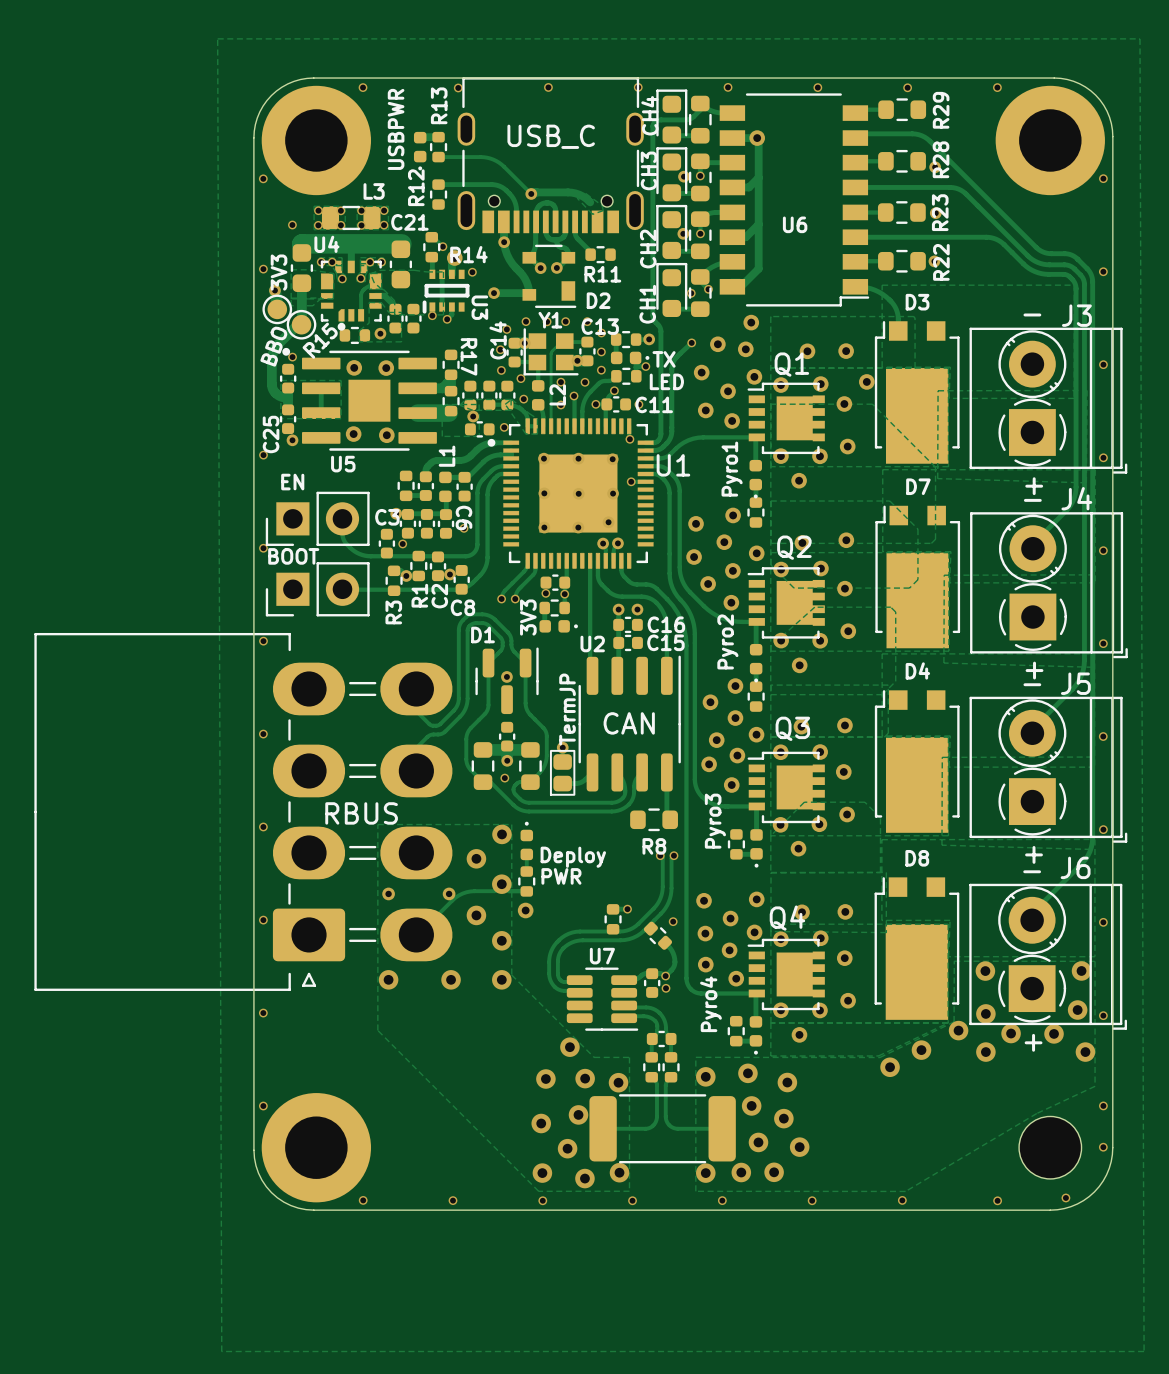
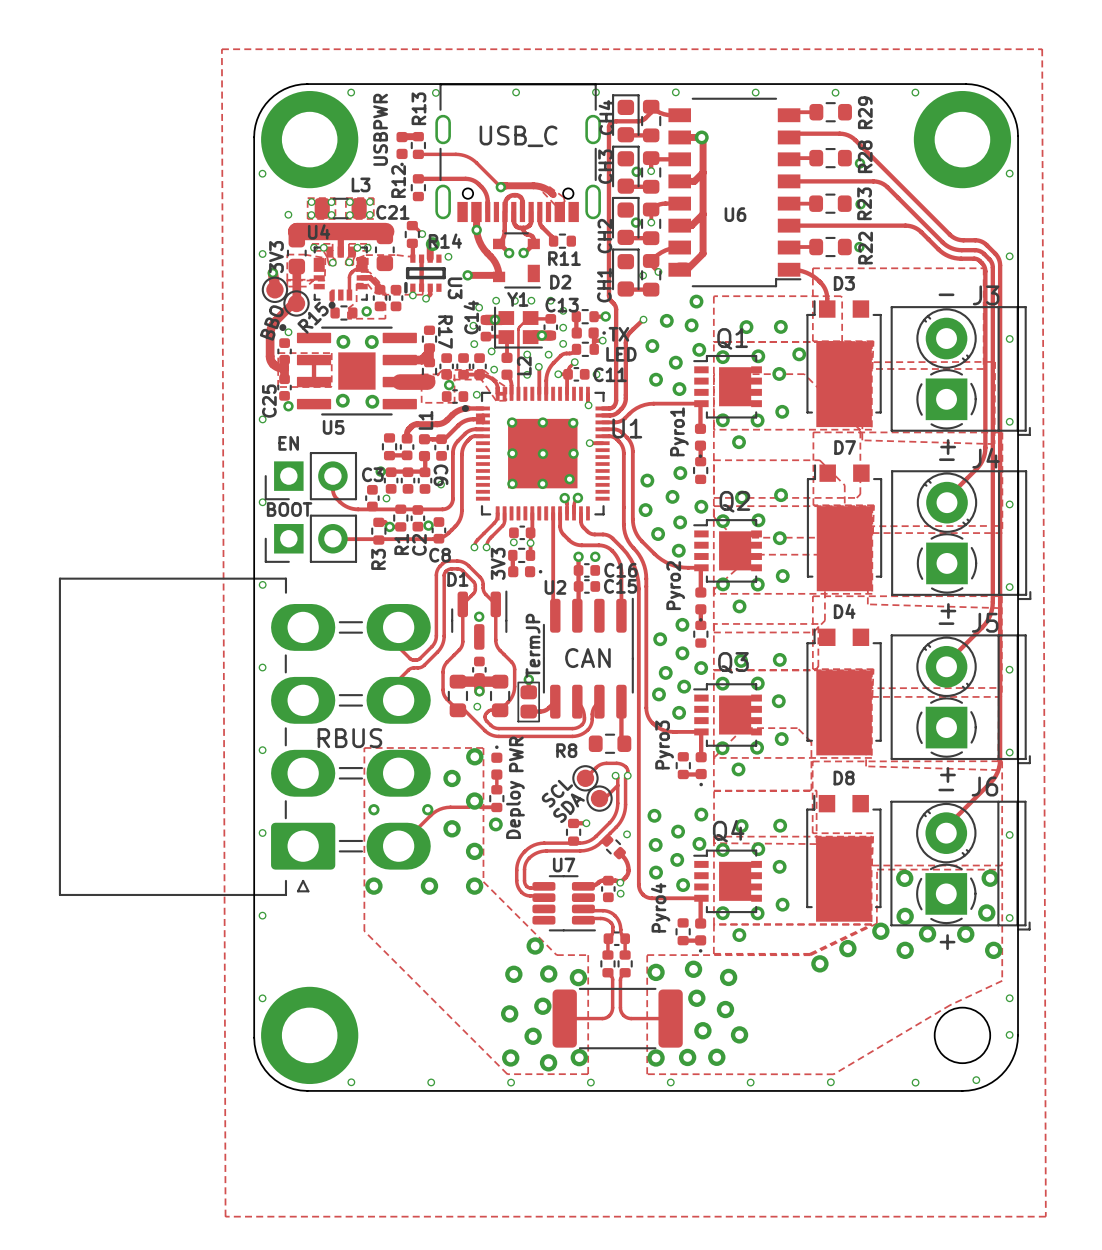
R8 name position: R8 (654, 846) -> R8 (566, 750)
track: none -> (627, 775) (627, 769) (623, 764) (606, 763) (597, 766) (585, 778)
part text rotation: 0° (573, 857) -> 90° counterclockwise (515, 809)
part: none -> (585, 778)
track: none -> (617, 785) (604, 798) (599, 798)
part text rotation: 0° (561, 876) -> 90° counterclockwise (516, 754)
part: none -> (599, 798)

